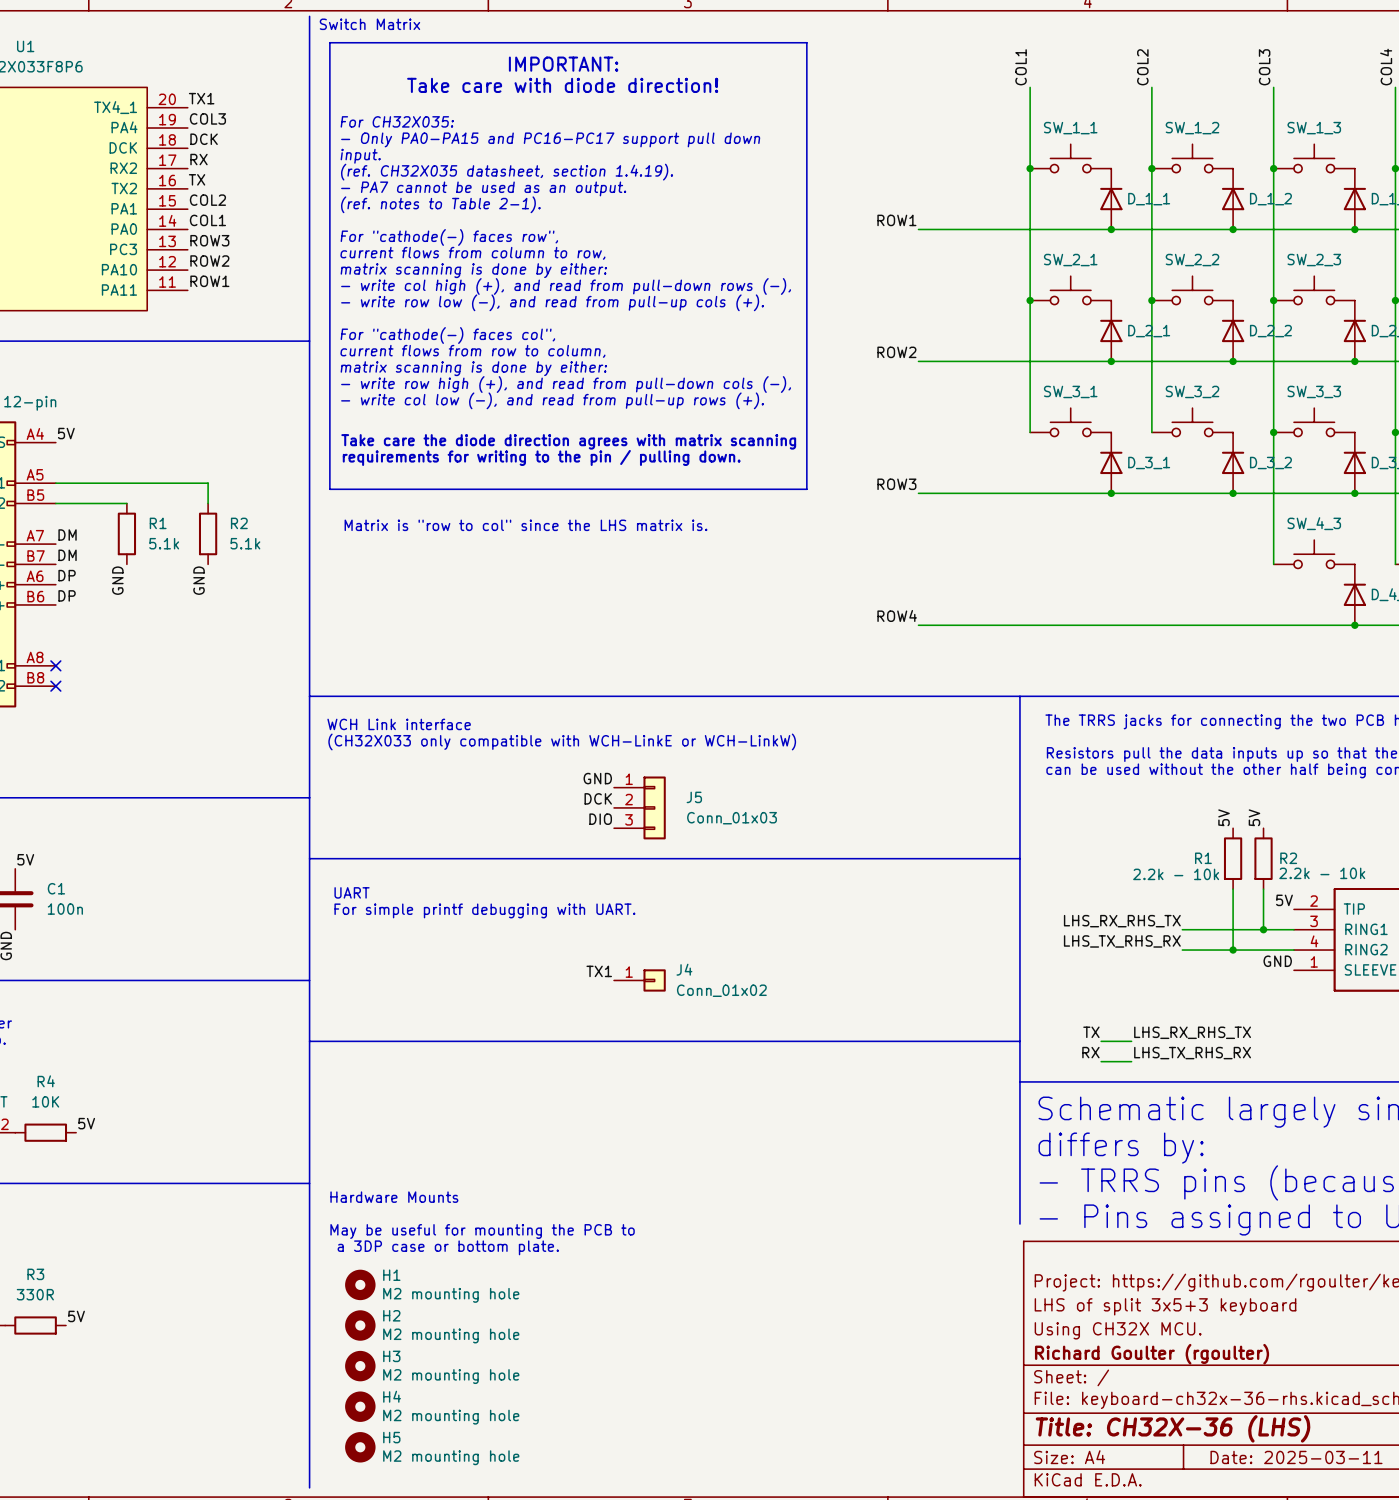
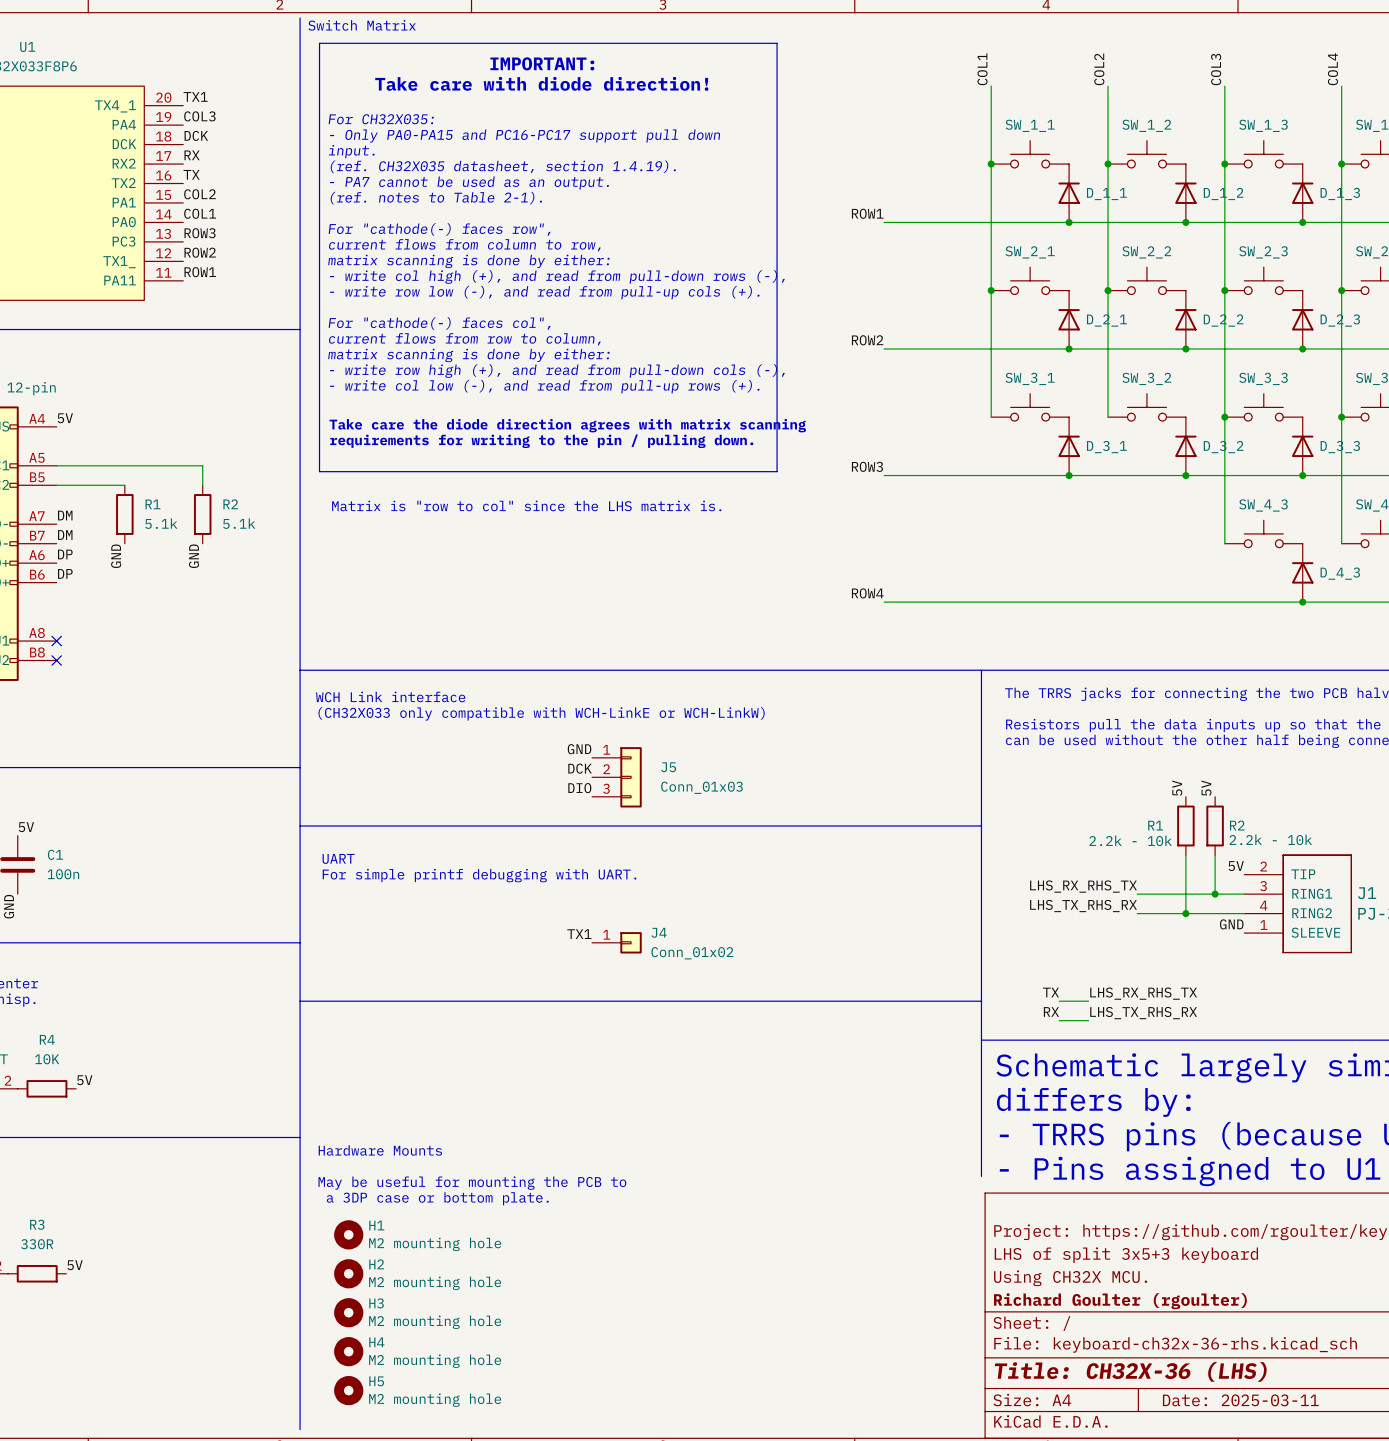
U1 pin name: PA10 (119, 269) -> TX1_ (119, 262)

